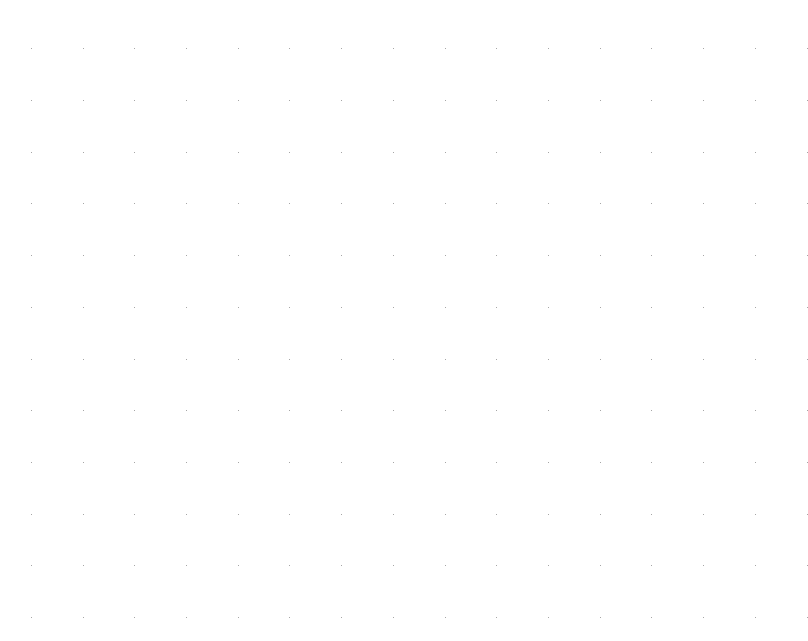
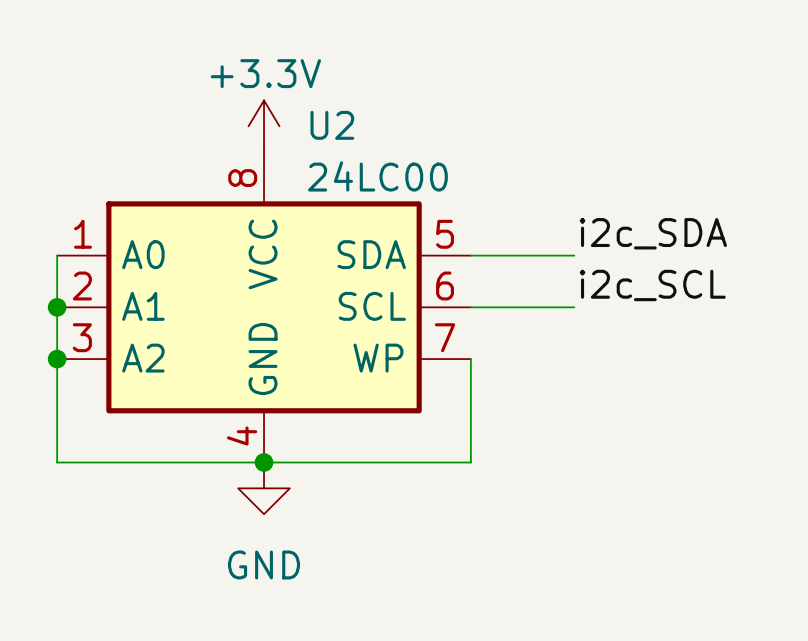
power symbol: none -> +3.3V (264, 126)
label: none -> i2c_SDA (653, 233)
wire: none -> (57, 255) (57, 462) (470, 462) (470, 359)
wire: none -> (470, 255) (574, 255)
label: none -> i2c_SCL (652, 285)
junction: none -> (57, 307)
U2: none -> 24LC00 (264, 307)
wire: none -> (470, 307) (574, 307)
junction: none -> (57, 359)
junction: none -> (264, 462)
power symbol: none -> GND (264, 488)

